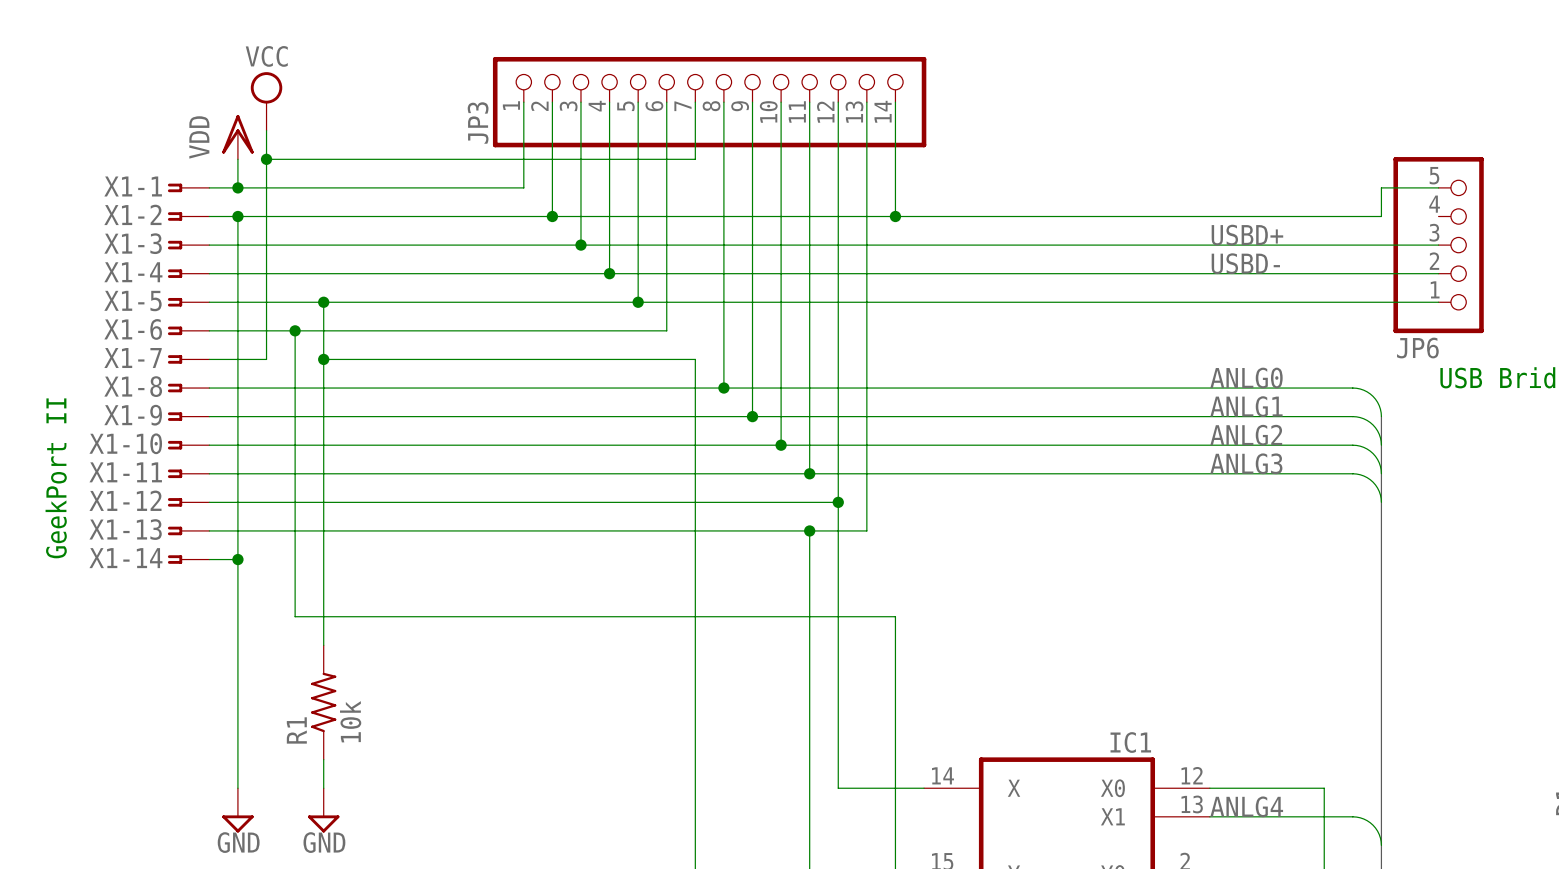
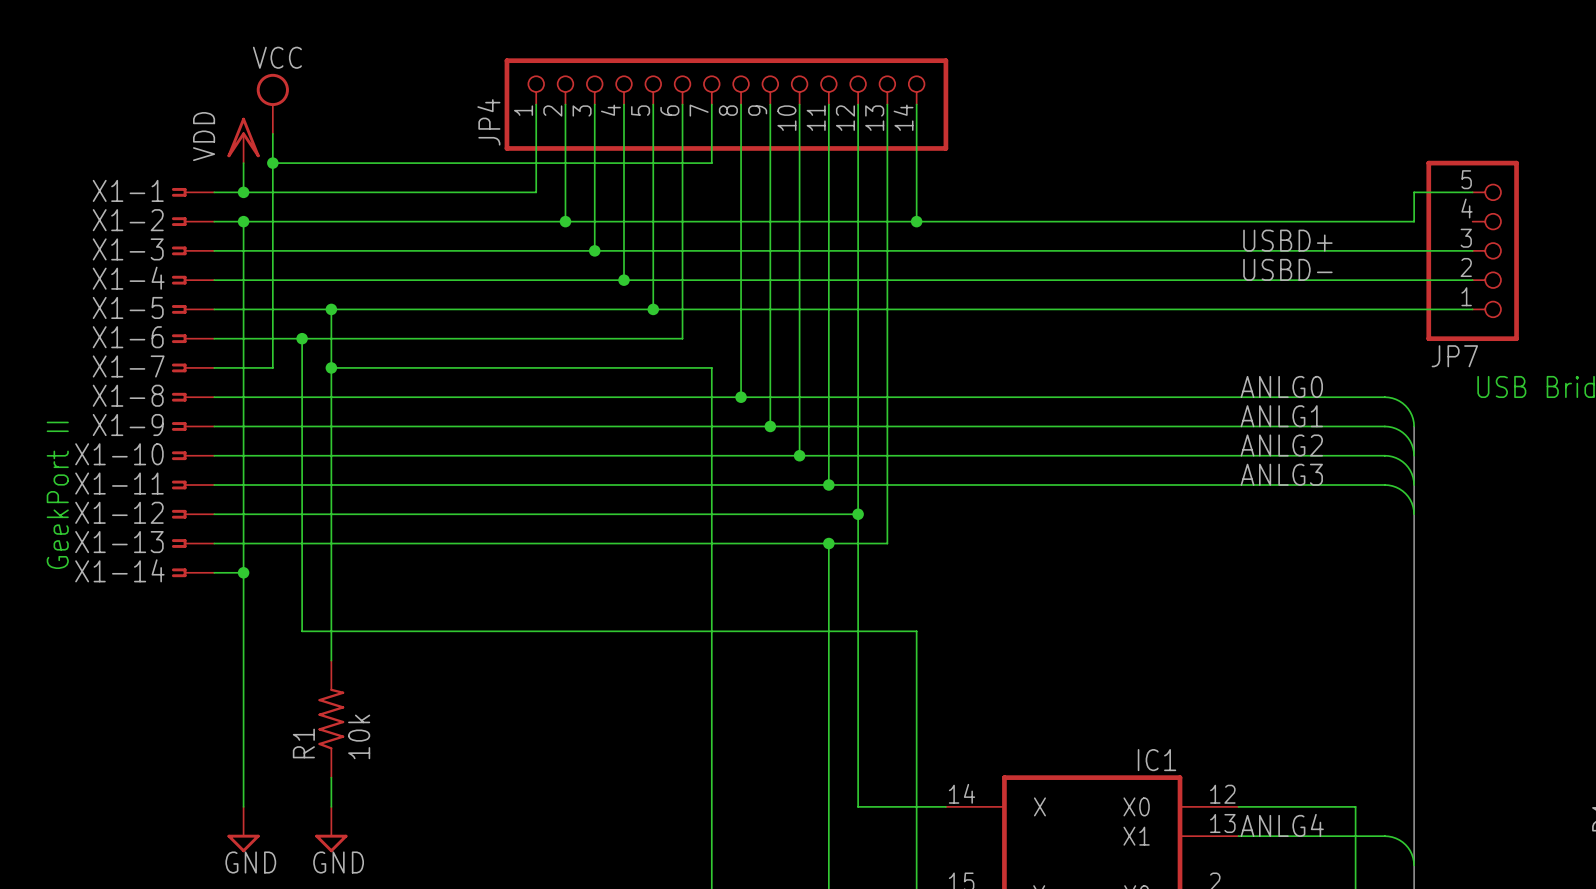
JP3 name: JP3 (478, 123) -> JP4 (488, 122)
JP6 name: JP6 (1417, 348) -> JP7 (1454, 356)

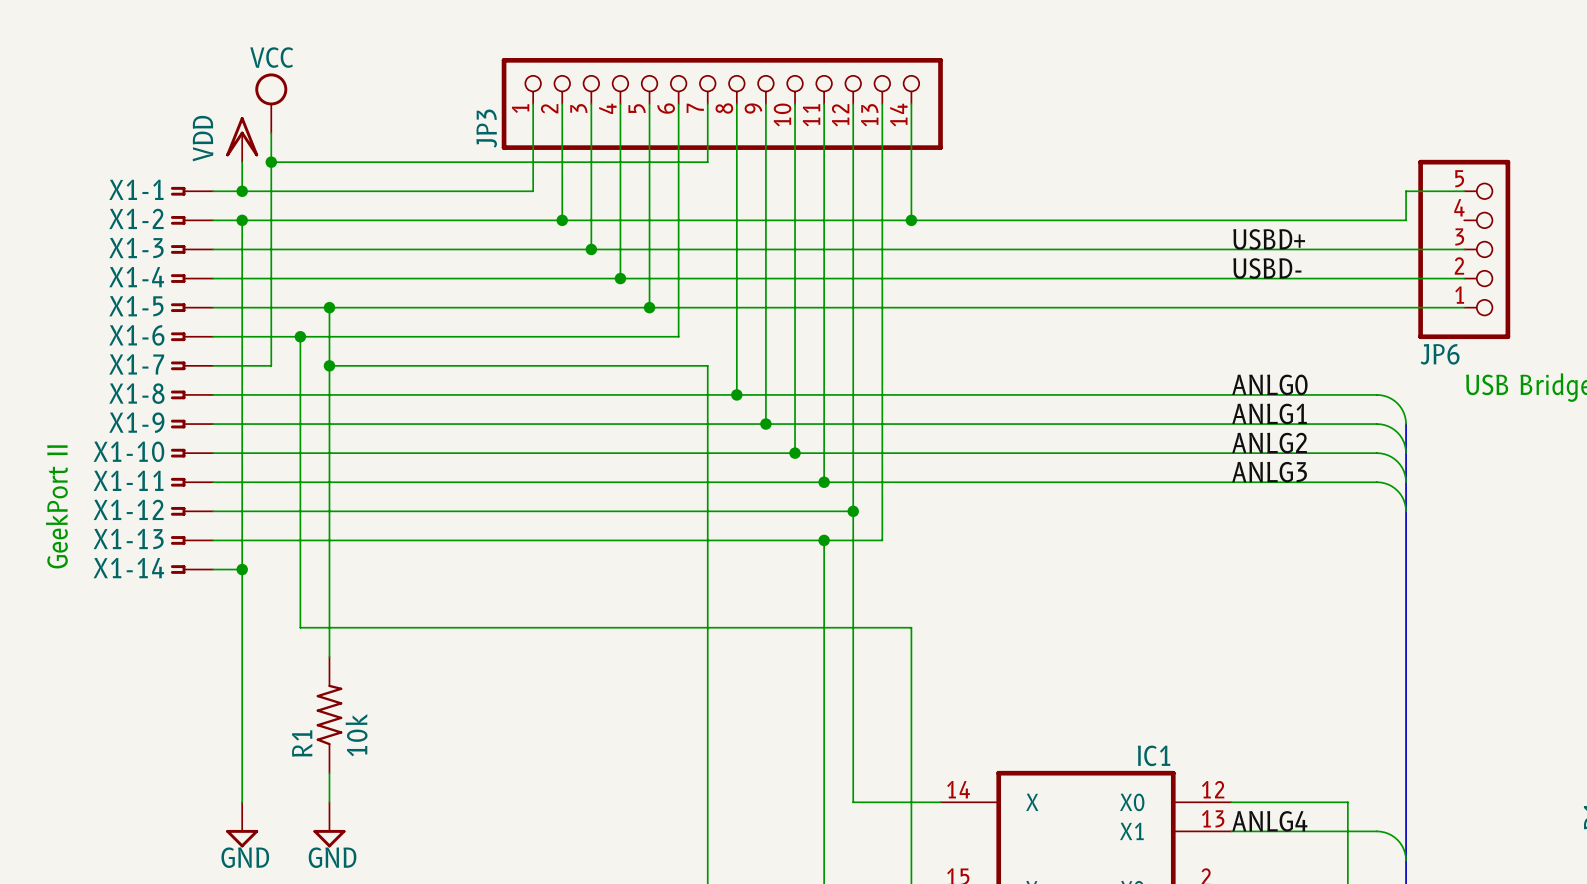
JP4 name: JP4 (488, 122) -> JP3 (486, 128)
JP7 name: JP7 (1454, 356) -> JP6 (1440, 354)

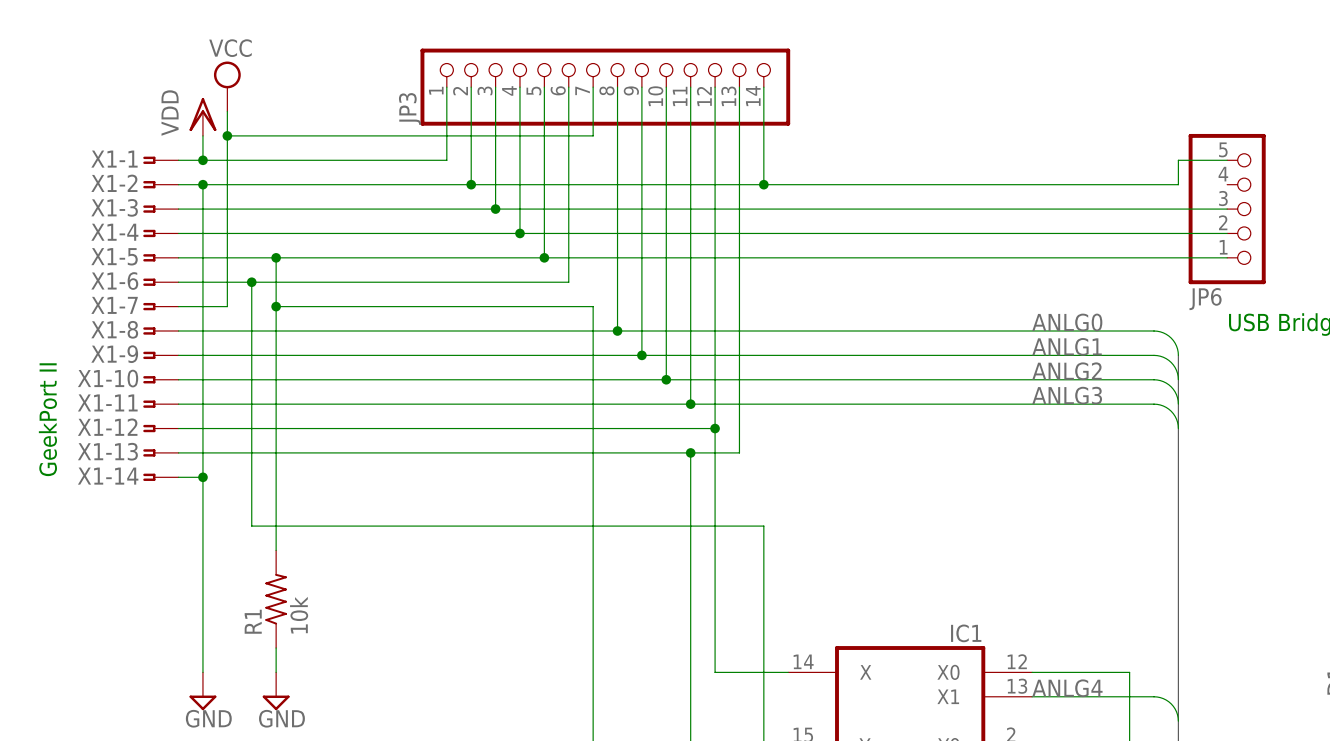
label: USBD+ (1269, 239) -> none
label: USBD- (1267, 268) -> none

